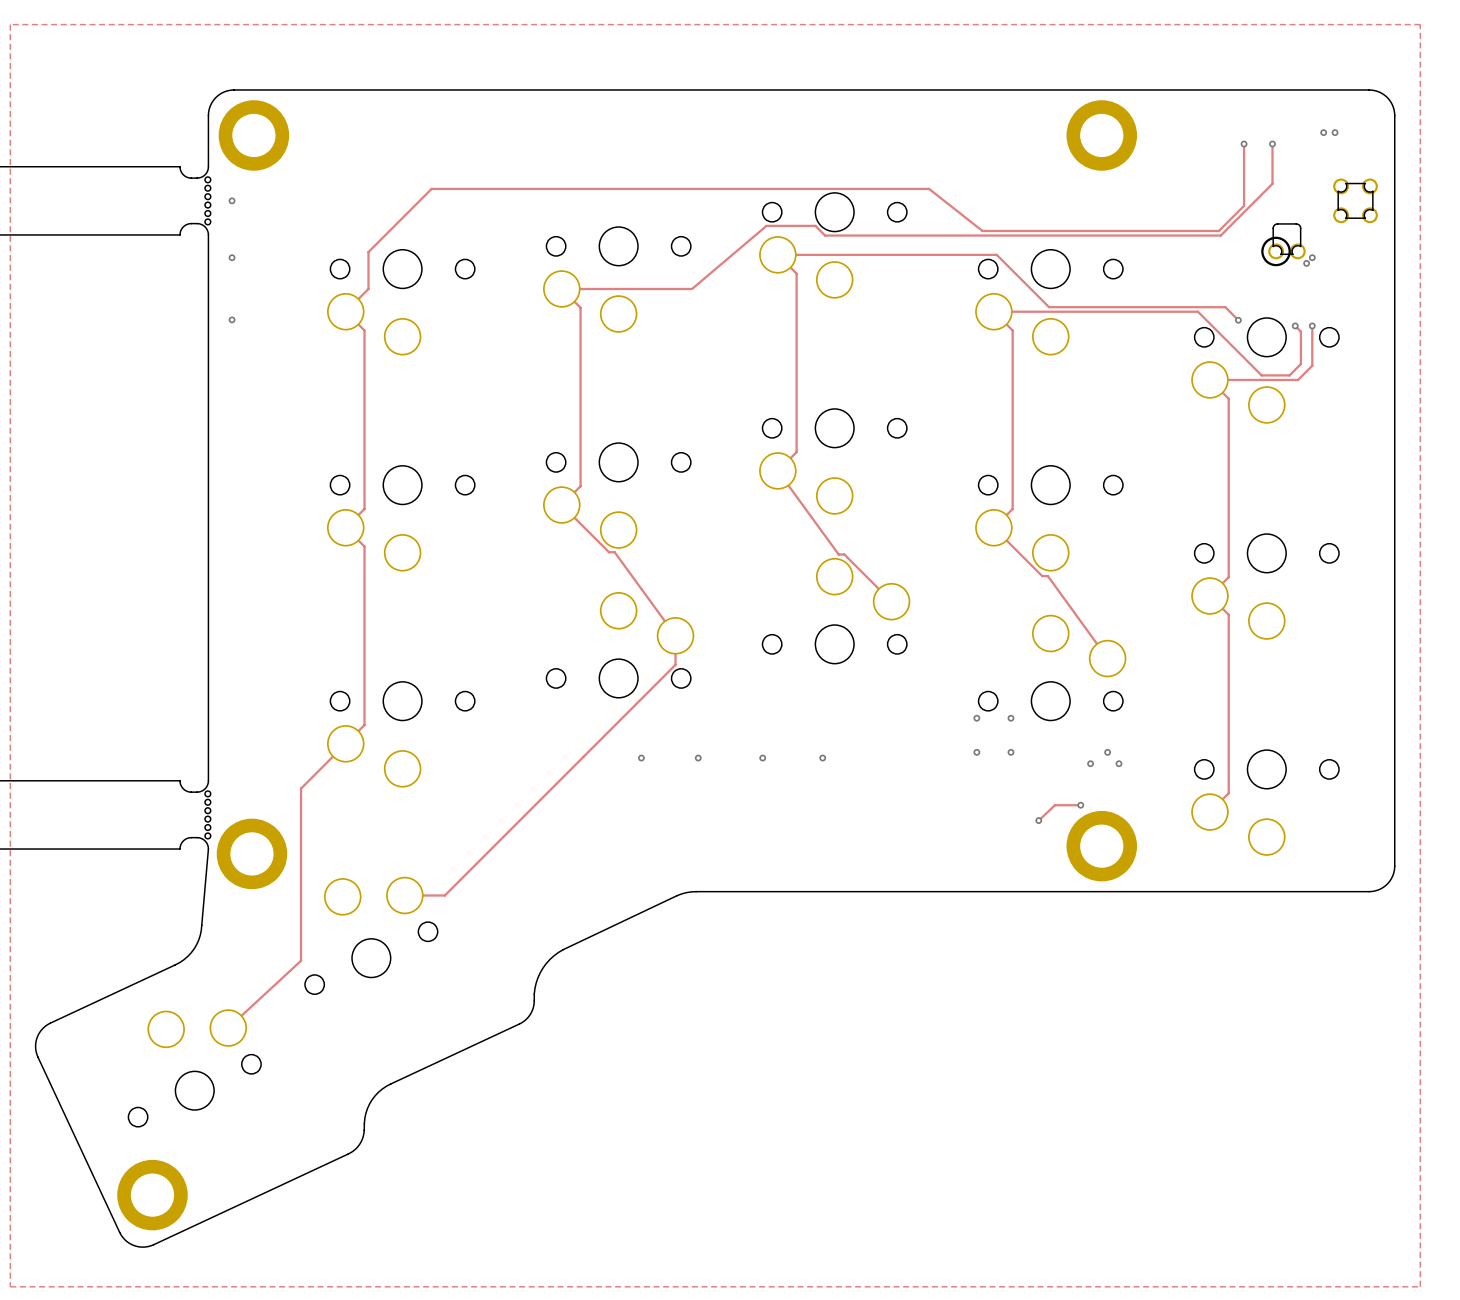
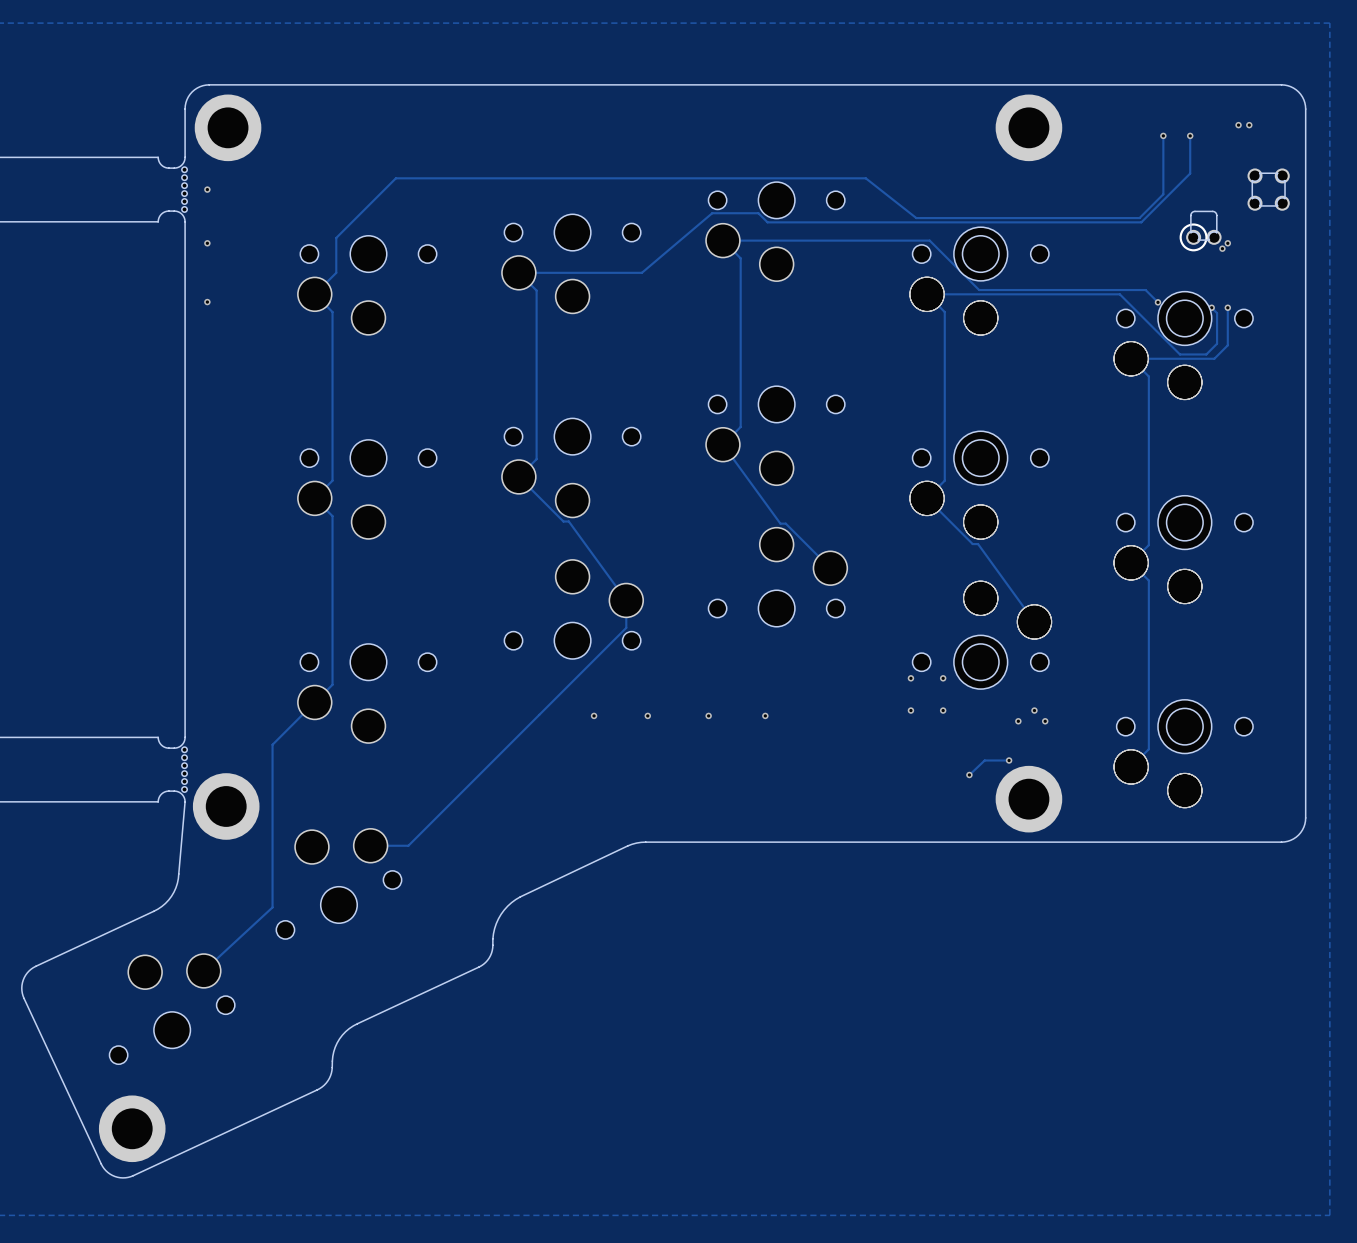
part: none -> (958, 281)
part: none -> (1162, 345)
part: none -> (958, 485)
part: none -> (1162, 549)
part: none -> (1003, 634)
part: none -> (1162, 754)

